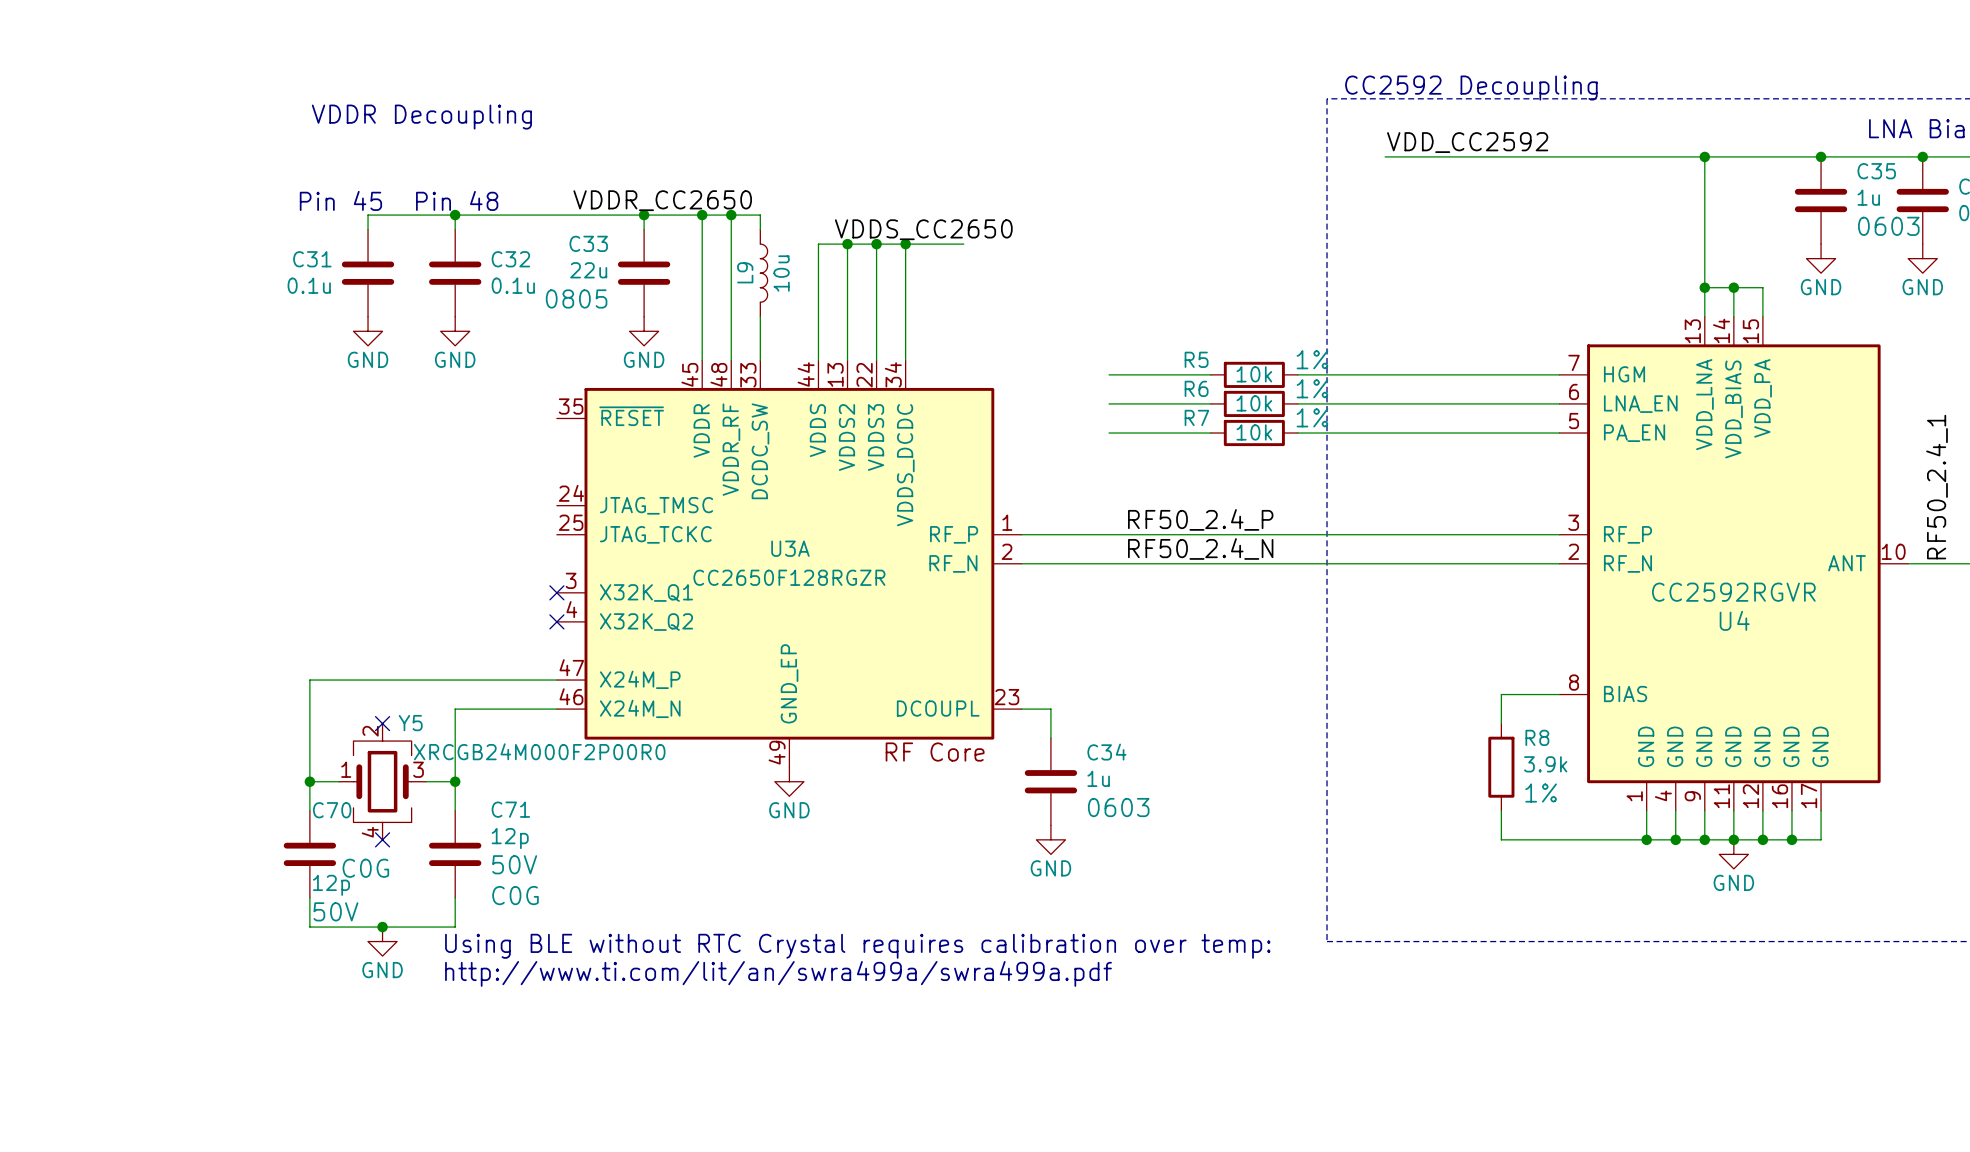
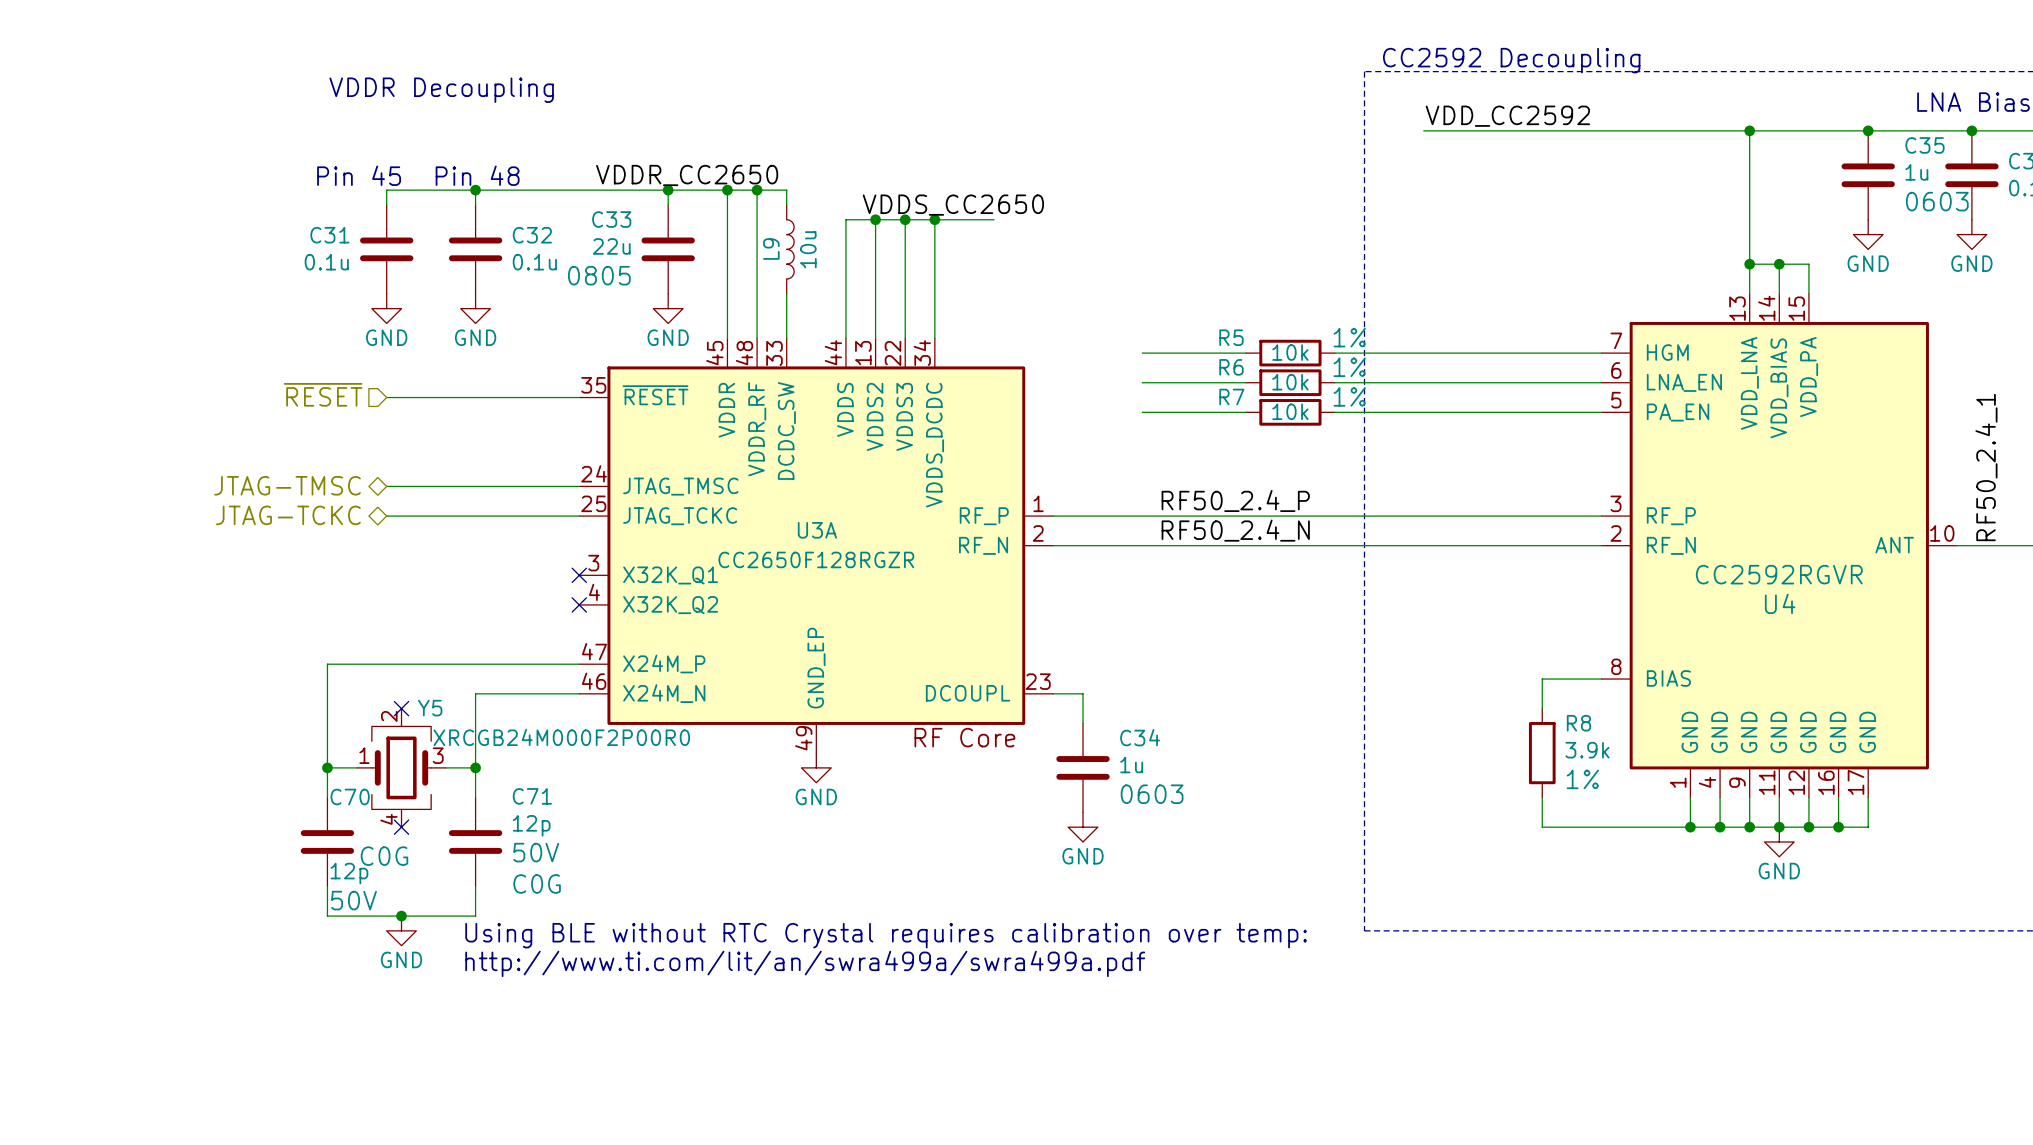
hierarchical label: none -> ~{RESET} (323, 394)
wire: none -> (386, 397) (579, 397)
hierarchical label: none -> JTAG-TMSC (287, 485)
wire: none -> (386, 486) (579, 486)
hierarchical label: none -> JTAG-TCKC (288, 515)
wire: none -> (386, 516) (579, 516)

